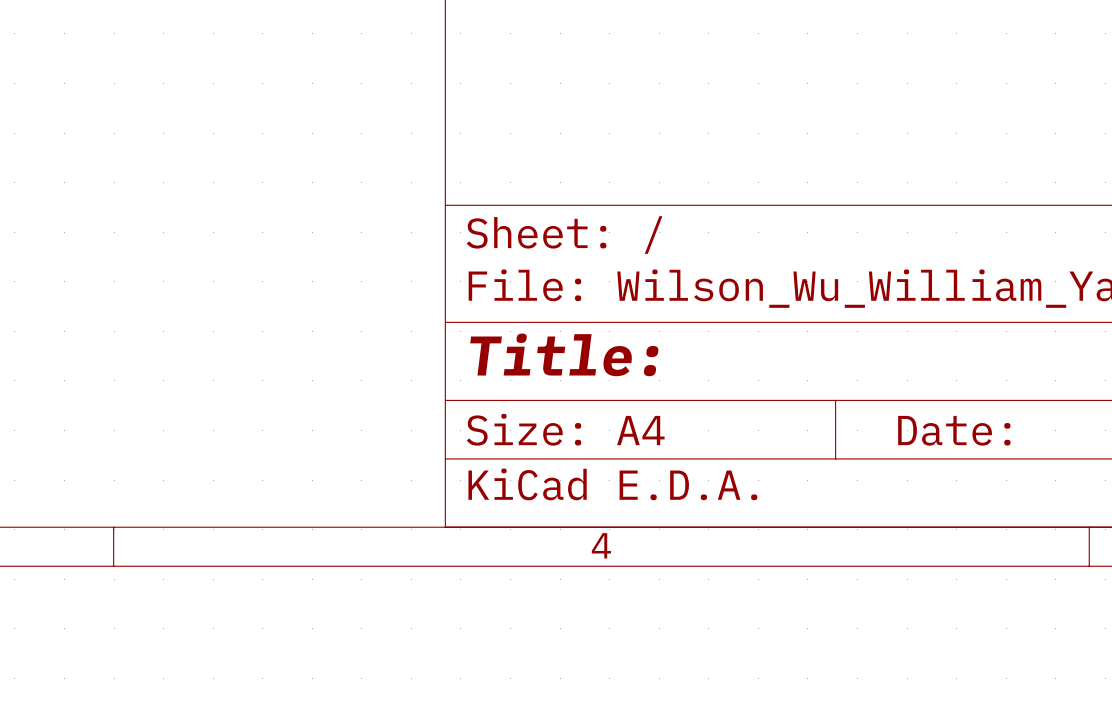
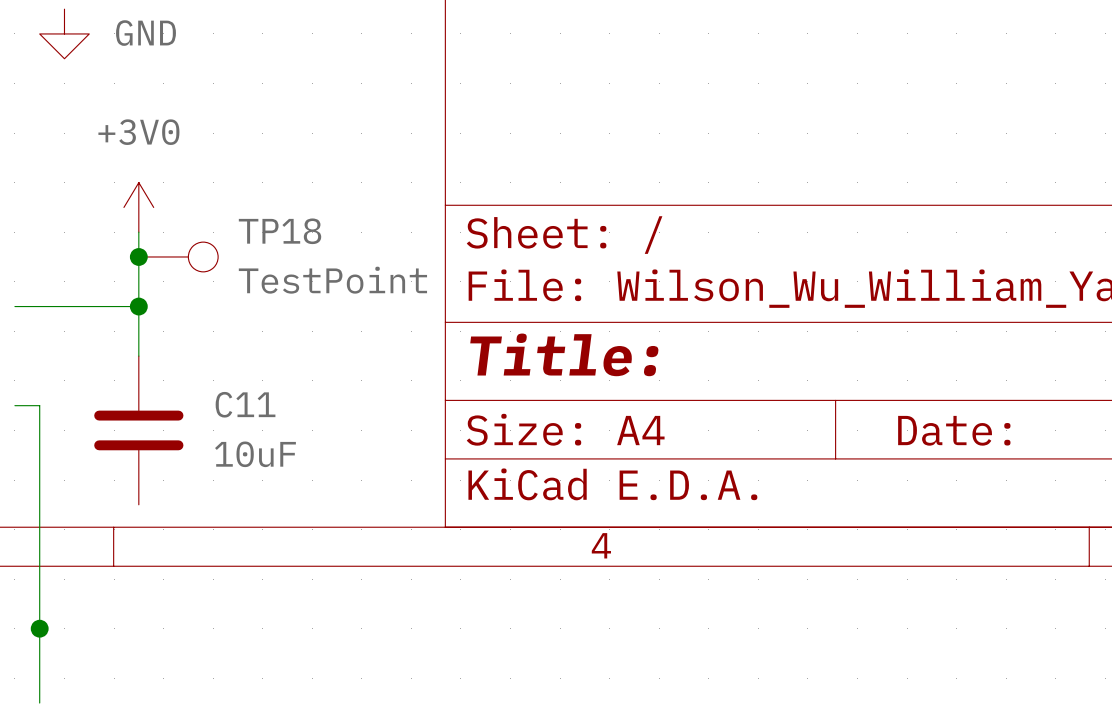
power symbol: none -> GND (64, 33)
power symbol: none -> +3V0 (138, 207)
wire: none -> (138, 232) (138, 356)
junction: none -> (138, 256)
TP18: none -> TestPoint (178, 256)
wire: none -> (14, 306) (138, 306)
junction: none -> (138, 306)
wire: none -> (14, 405) (39, 405) (39, 703)
C11: none -> 10uF (138, 430)
junction: none -> (39, 628)

